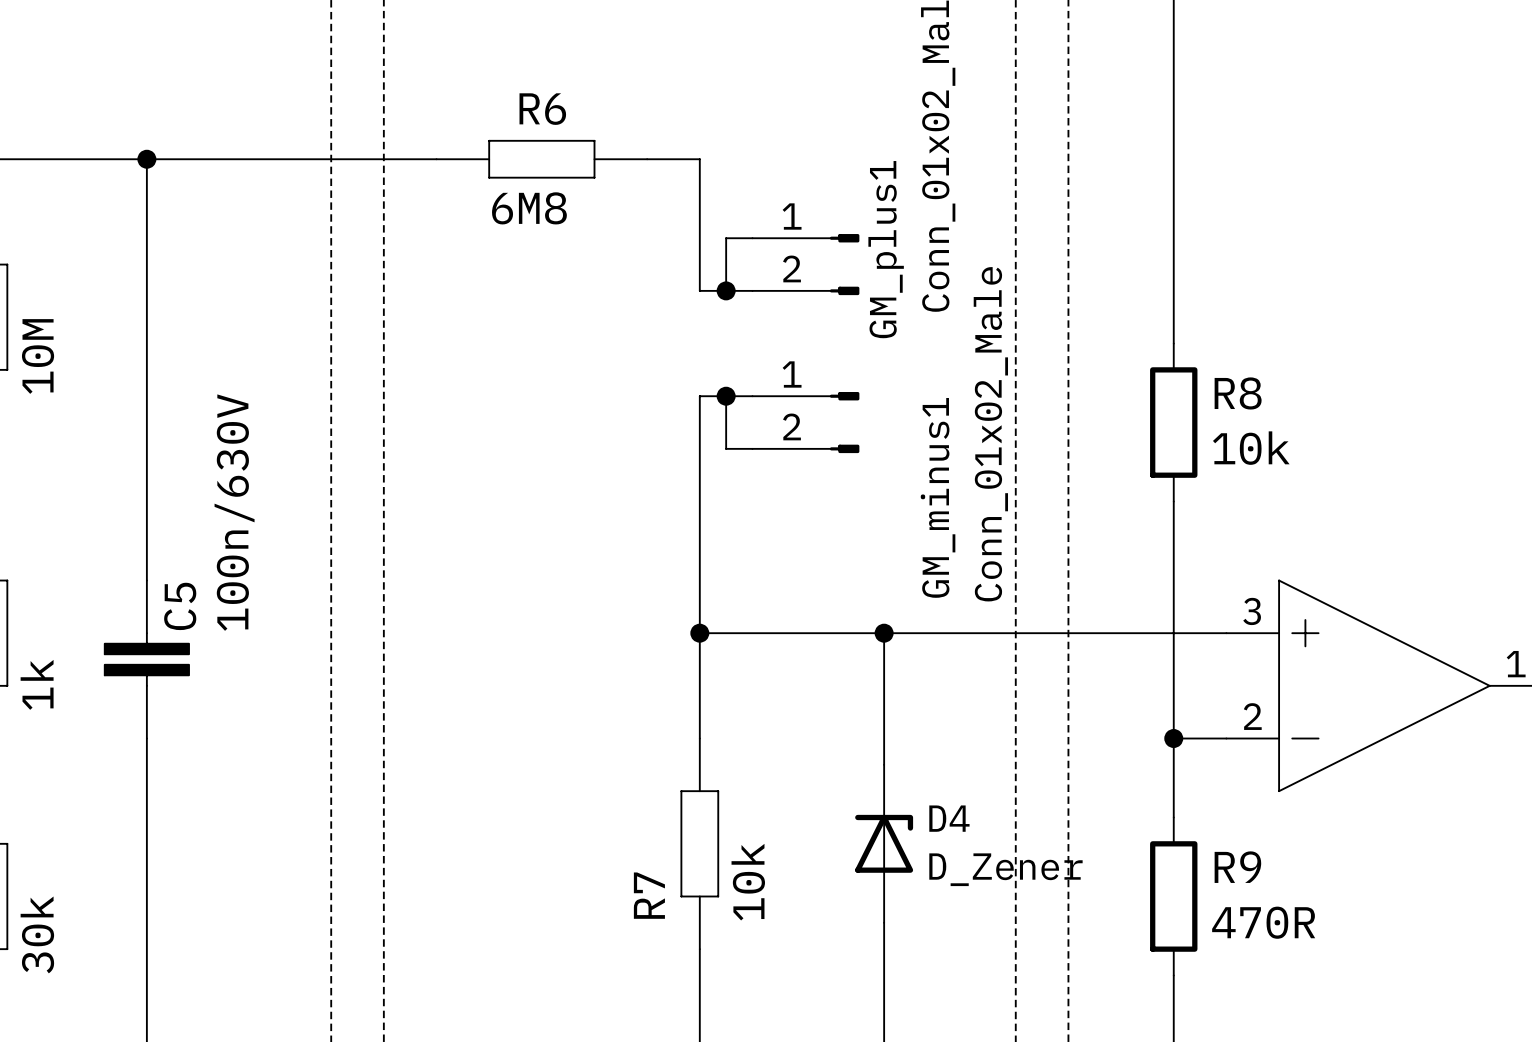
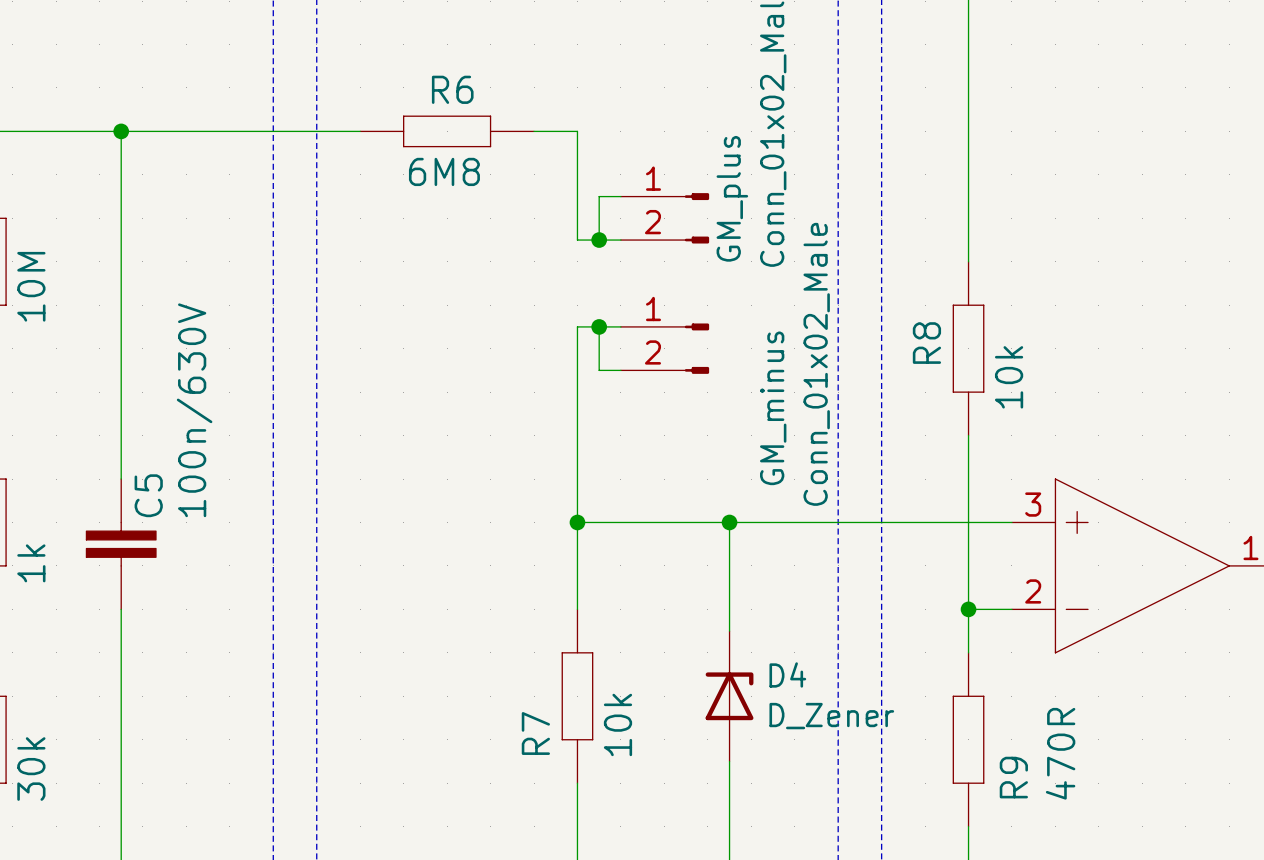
GM_plus1 name: GM_plus1 (886, 249) -> GM_plus (732, 198)
R8 symbol: [1150, 343, 1198, 502] -> [953, 261, 984, 436]
R8 name position: R8 (1238, 393) -> R8 (926, 343)
GM_minus1 name: GM_minus1 (938, 497) -> GM_minus (773, 408)
R9 symbol: [1150, 817, 1198, 976] -> [953, 652, 984, 827]
R9 name position: R9 (1237, 867) -> R9 (1013, 777)

